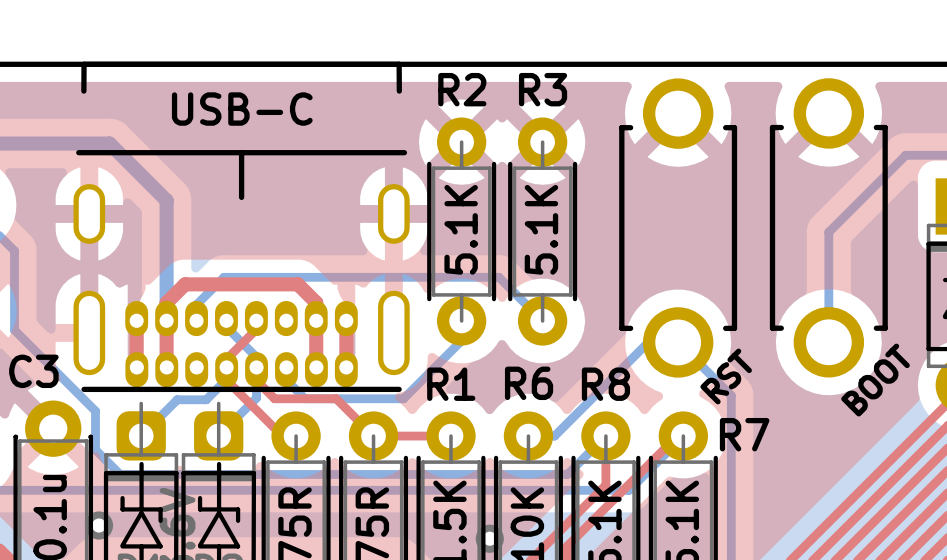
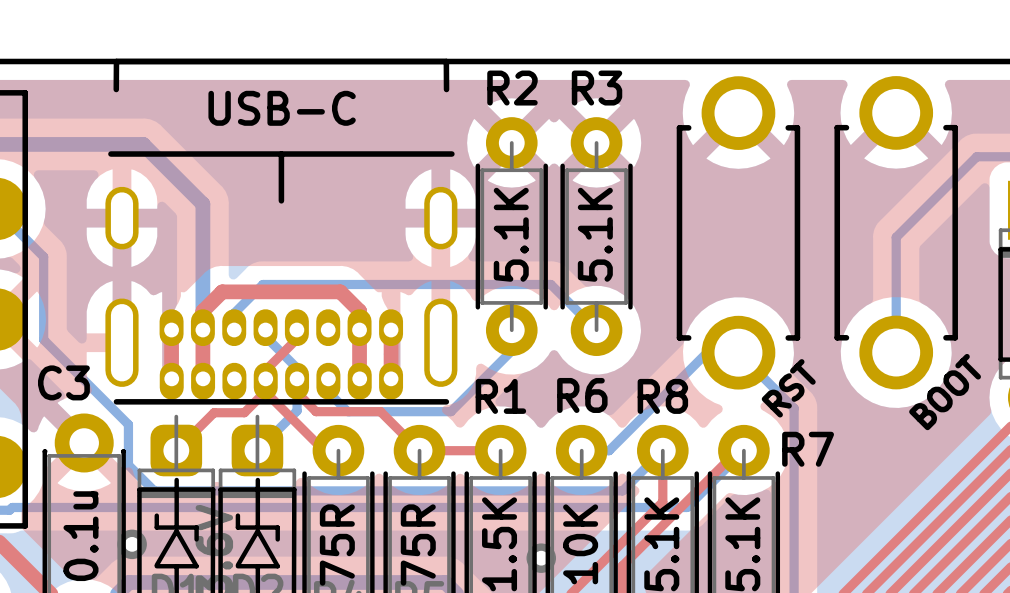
bottom track: (226, 367) (226, 379) (206, 399) (177, 399) (141, 435) -> none
top track: none -> (265, 391) (244, 412) (214, 412) (176, 450)

